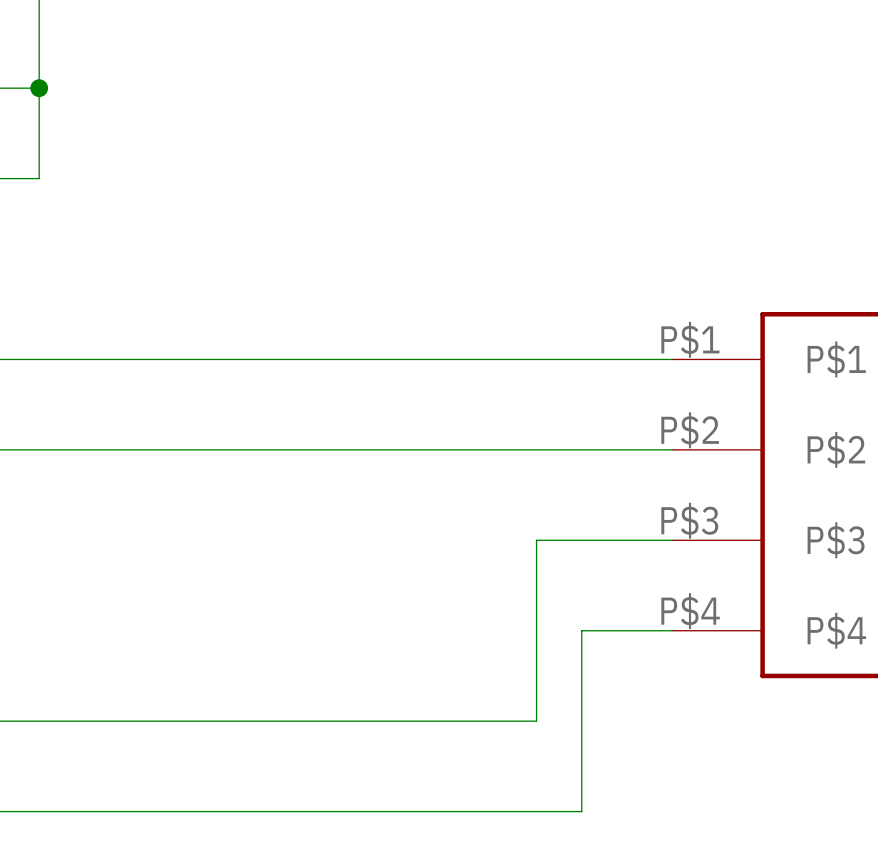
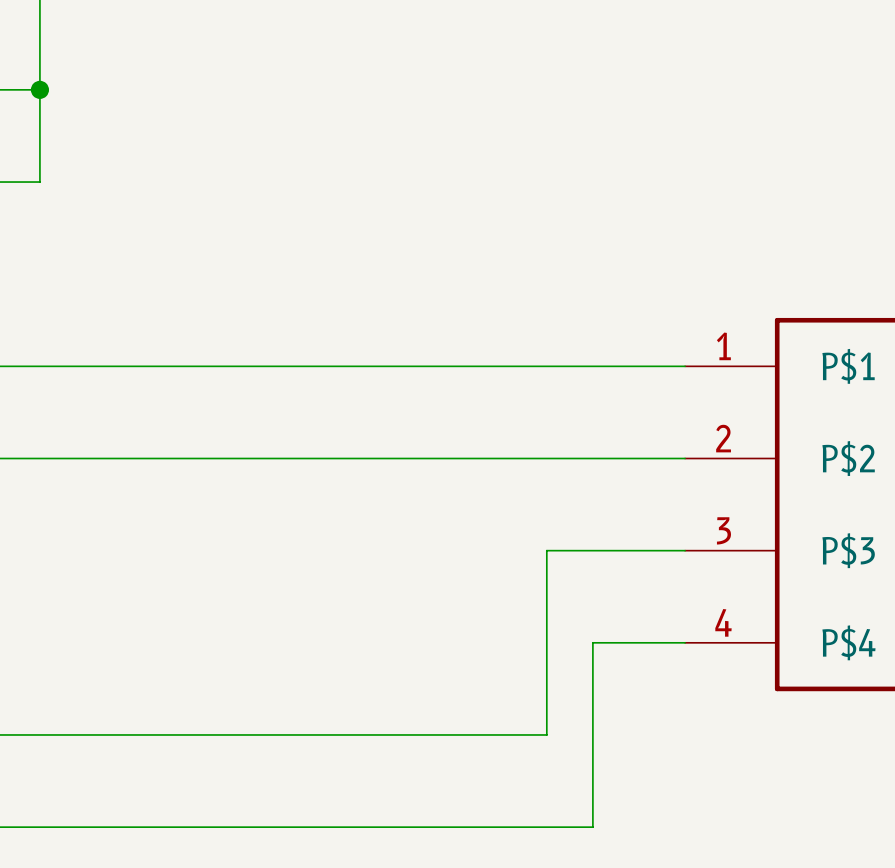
part pin number: P$1 (690, 339) -> 1 (723, 346)
part pin number: P$2 (690, 430) -> 2 (723, 438)
part pin number: P$3 (689, 520) -> 3 (723, 530)
part pin number: P$4 (690, 611) -> 4 (723, 622)

